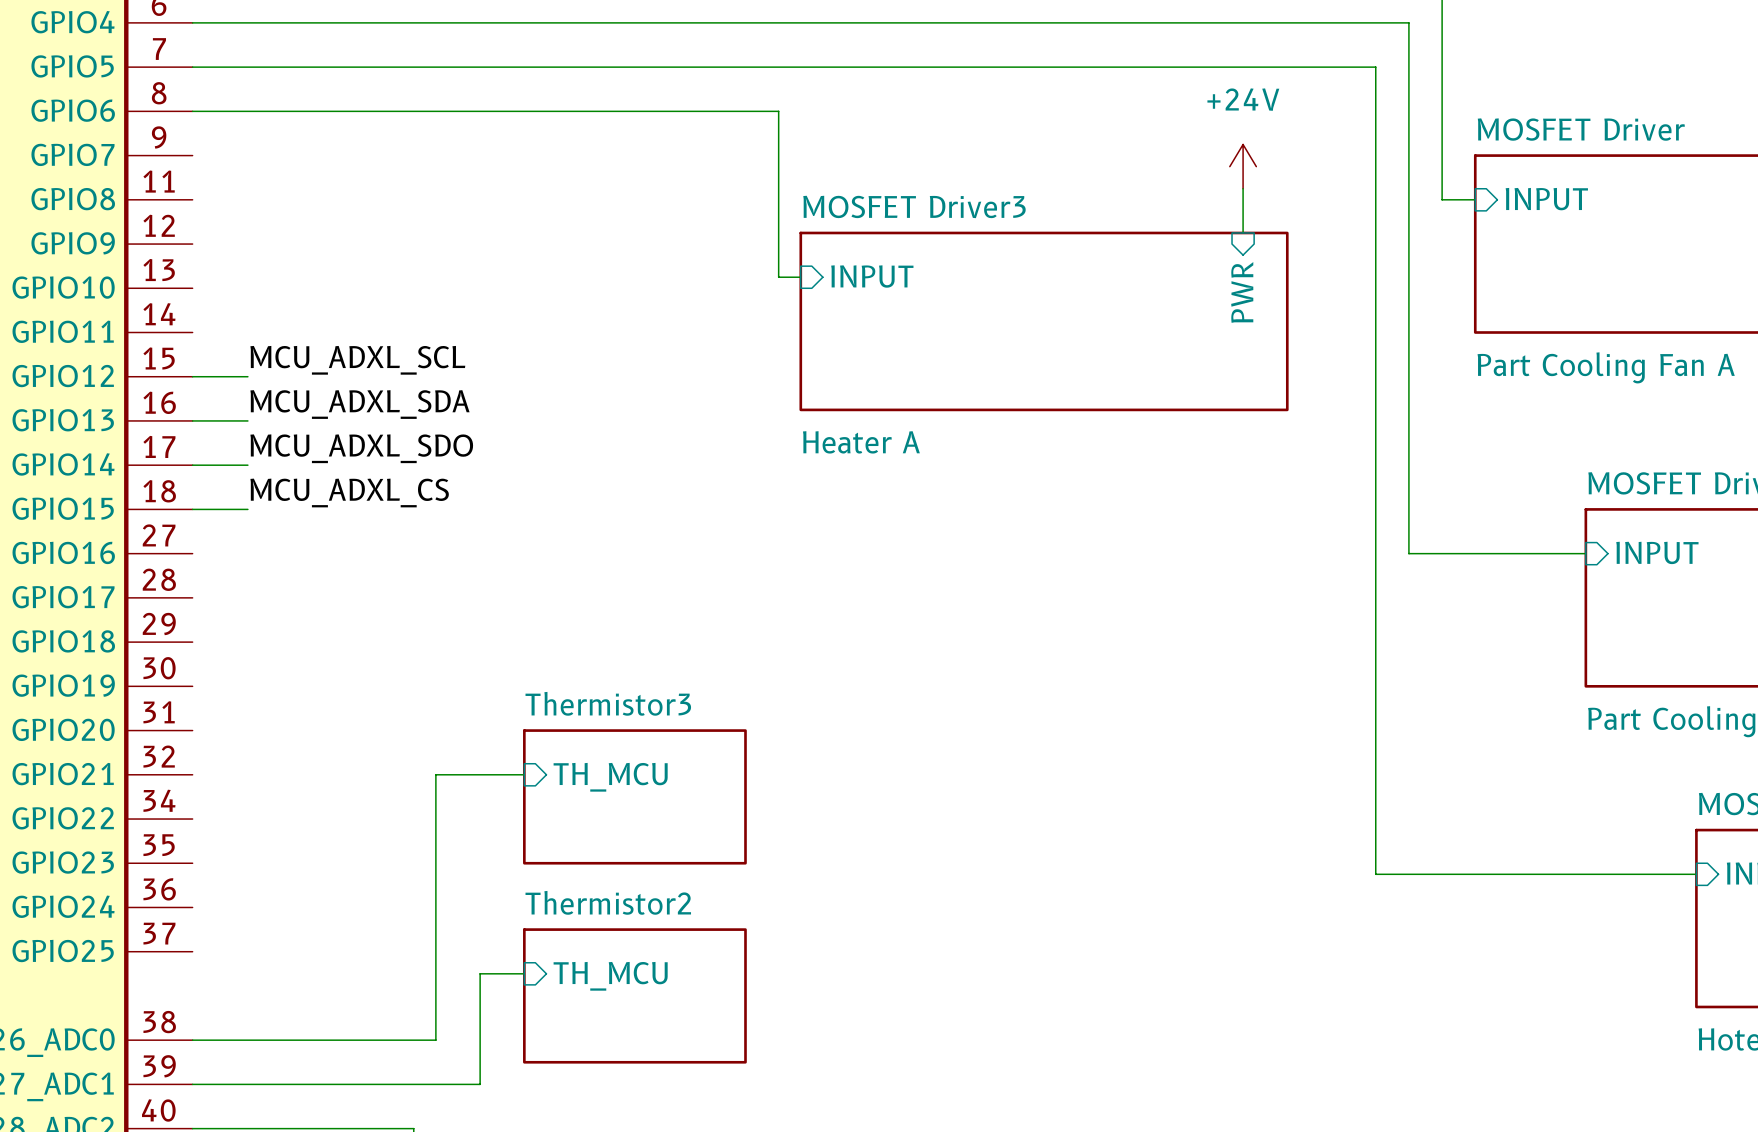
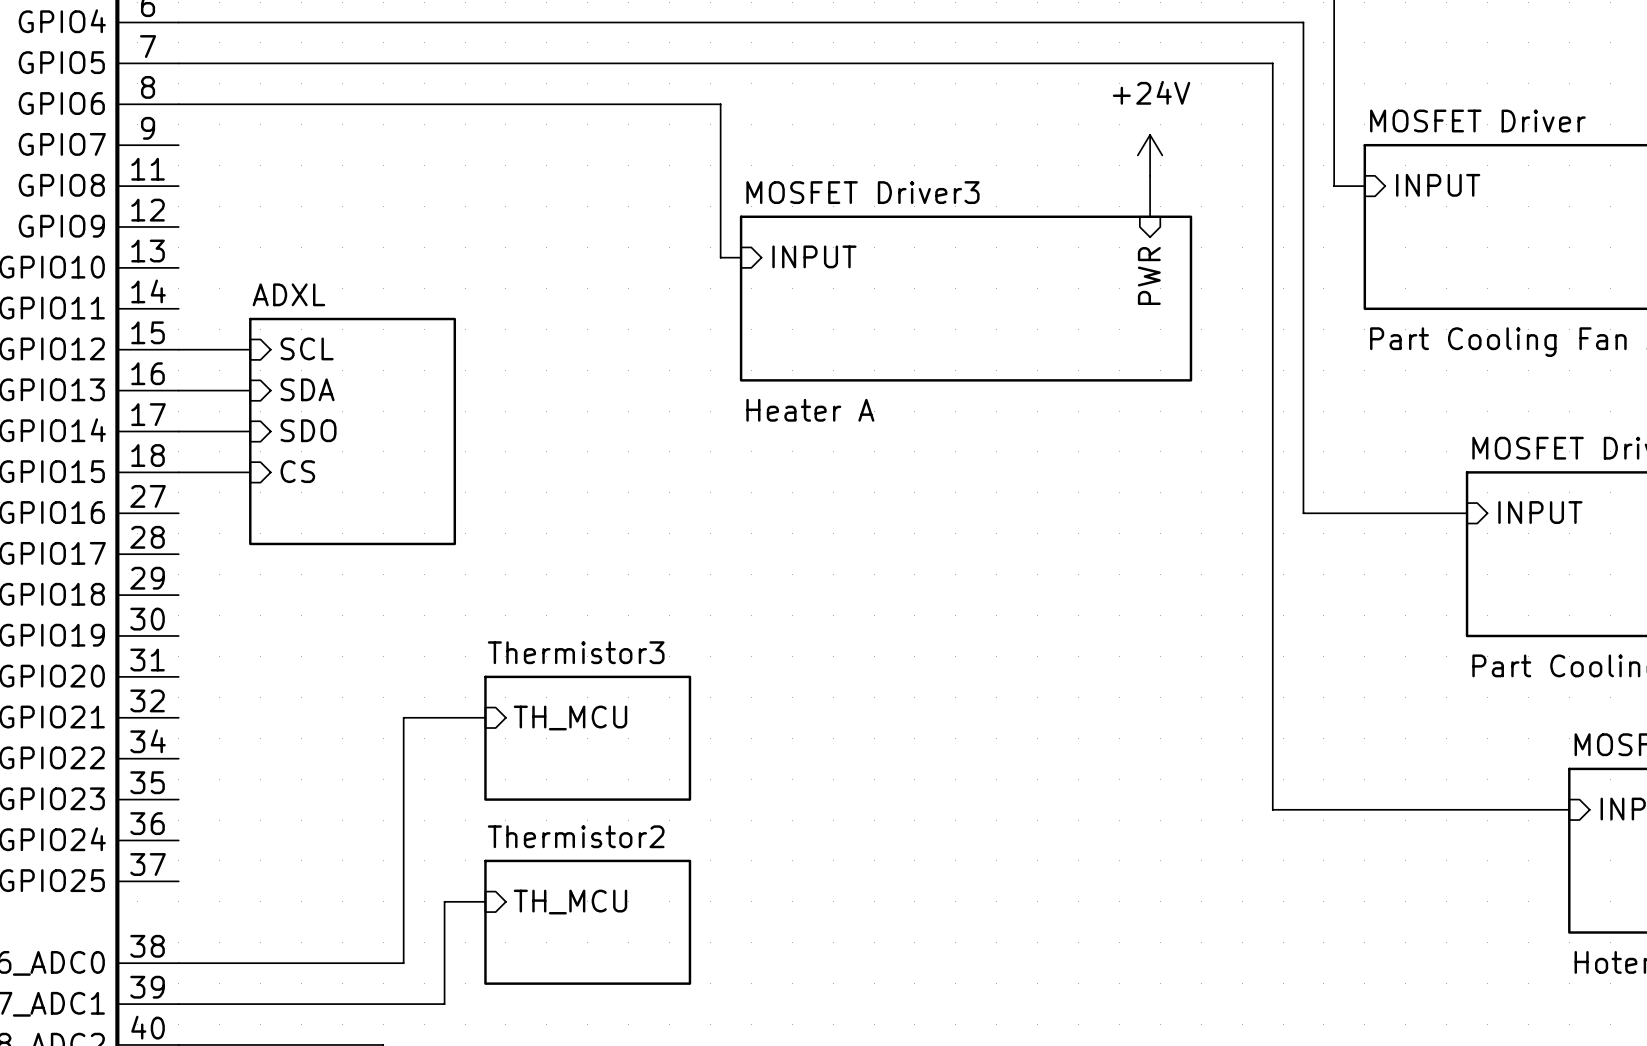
label: MCU_ADXL_SCL (357, 360) -> none
wire: none -> (229, 349) (250, 349)
sheet pin: none -> SCL (307, 348)
label: MCU_ADXL_SDA (359, 404) -> none
wire: none -> (229, 390) (250, 390)
sheet pin: none -> SDA (307, 389)
label: MCU_ADXL_SDO (361, 448) -> none
sheet pin: none -> SDO (308, 430)
wire: none -> (229, 431) (250, 431)
sheet ADXL: none -> (352, 431)
label: MCU_ADXL_CS (349, 492) -> none
sheet pin: none -> CS (297, 471)
wire: none -> (229, 472) (250, 472)

